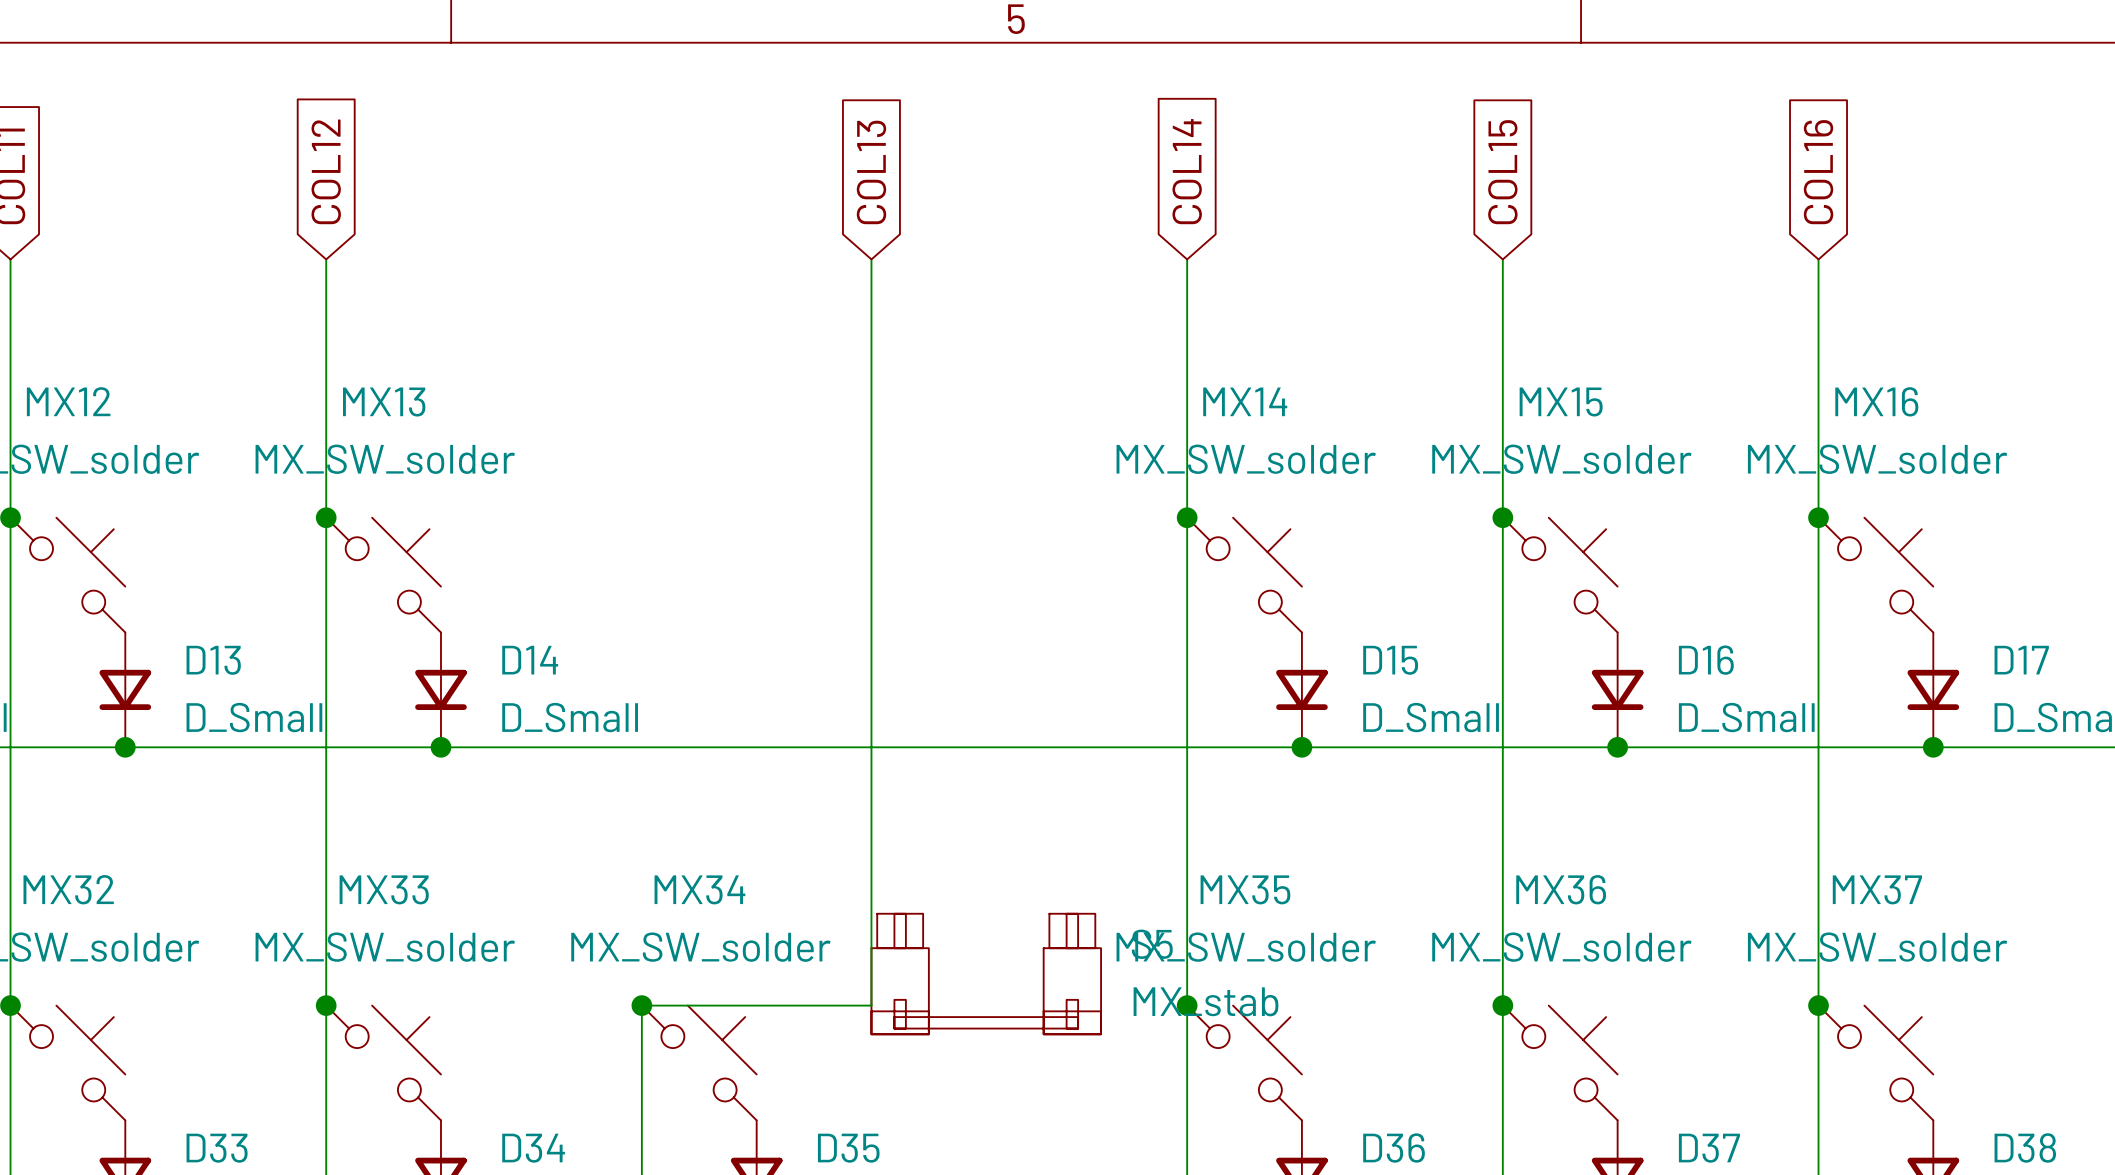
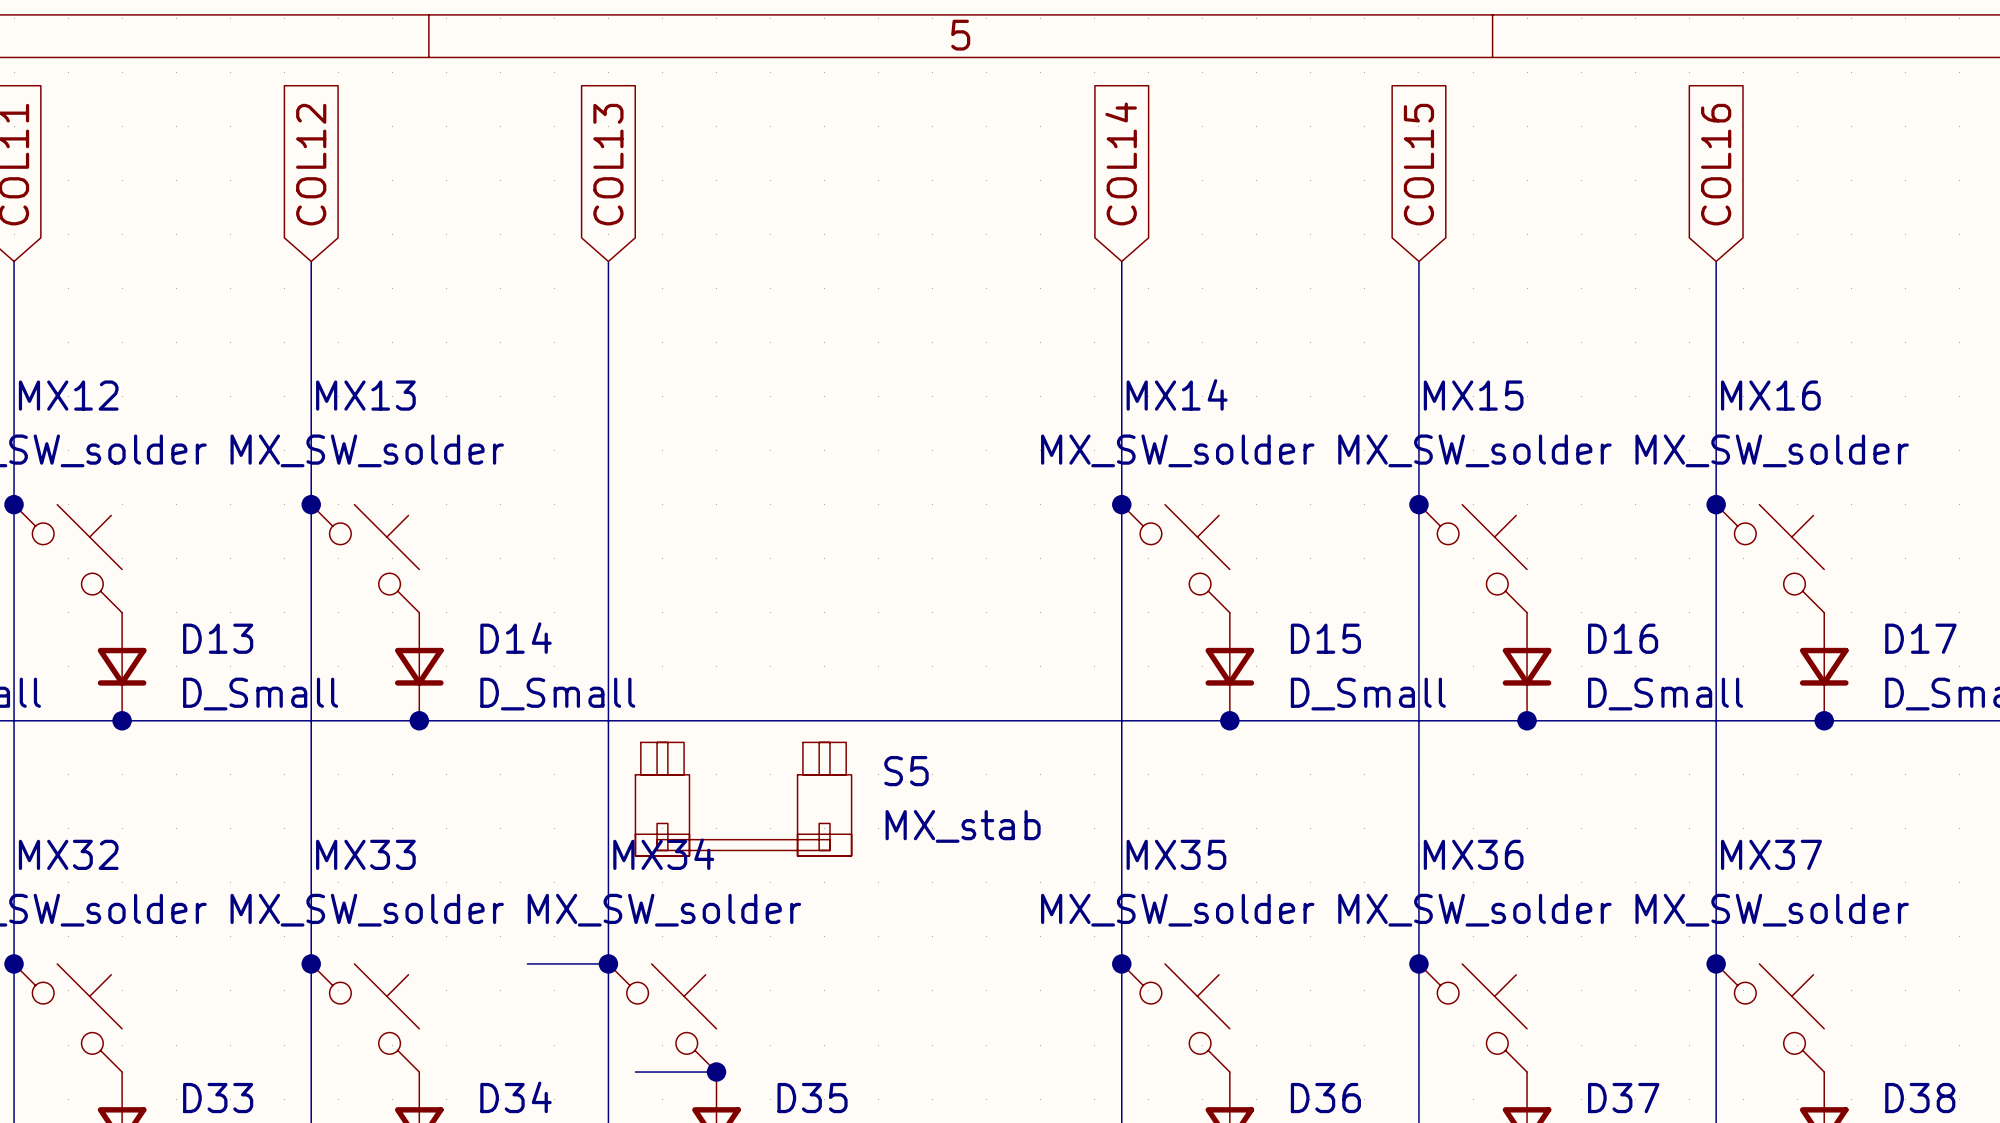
global label position: COL13 (871, 172) -> COL13 (608, 164)
wire: none -> (608, 261) (608, 963) (527, 963)
wire: (871, 259) (871, 1005) (641, 1005) -> none
S5 position: (986, 974) -> (743, 799)
wire: none -> (635, 1072) (716, 1072)
junction: none -> (716, 1072)

